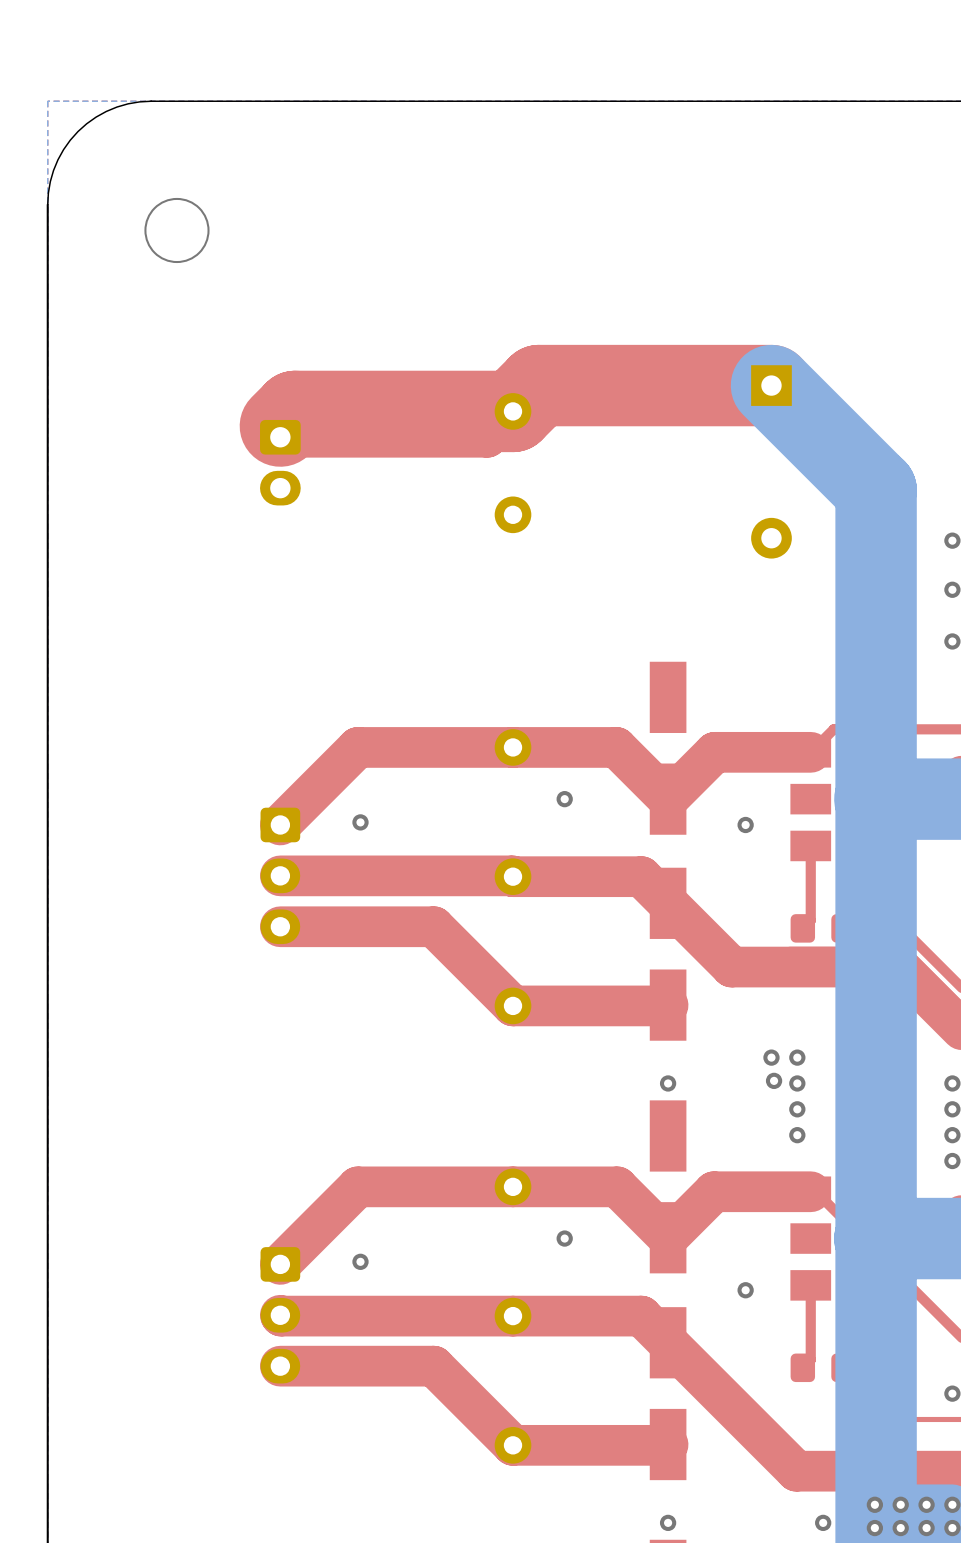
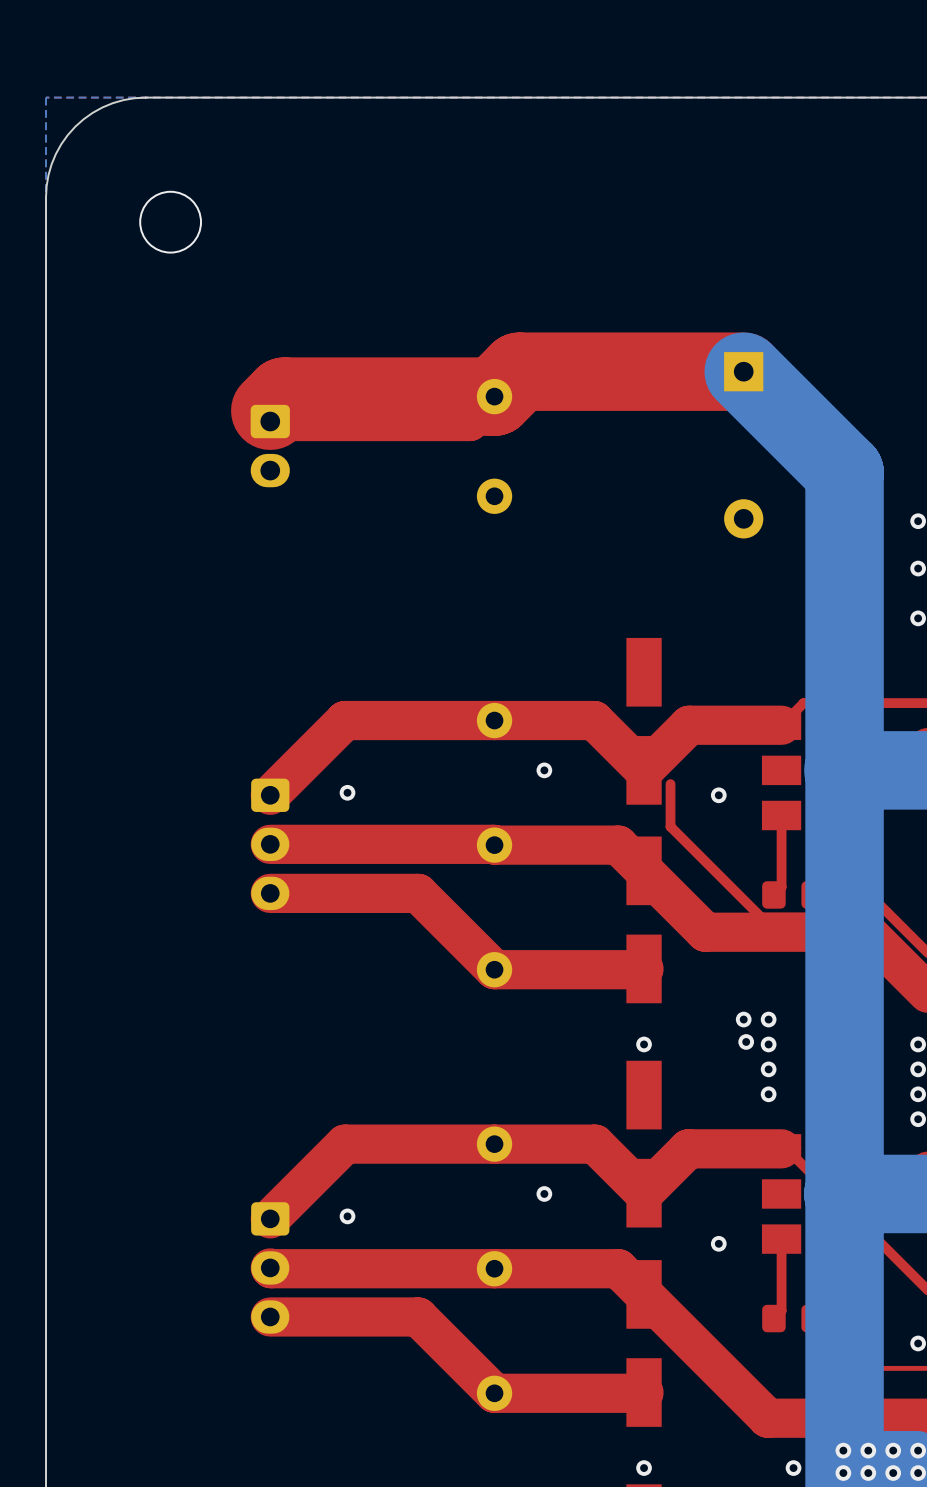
top track: none -> (670, 784) (670, 826) (761, 917)

